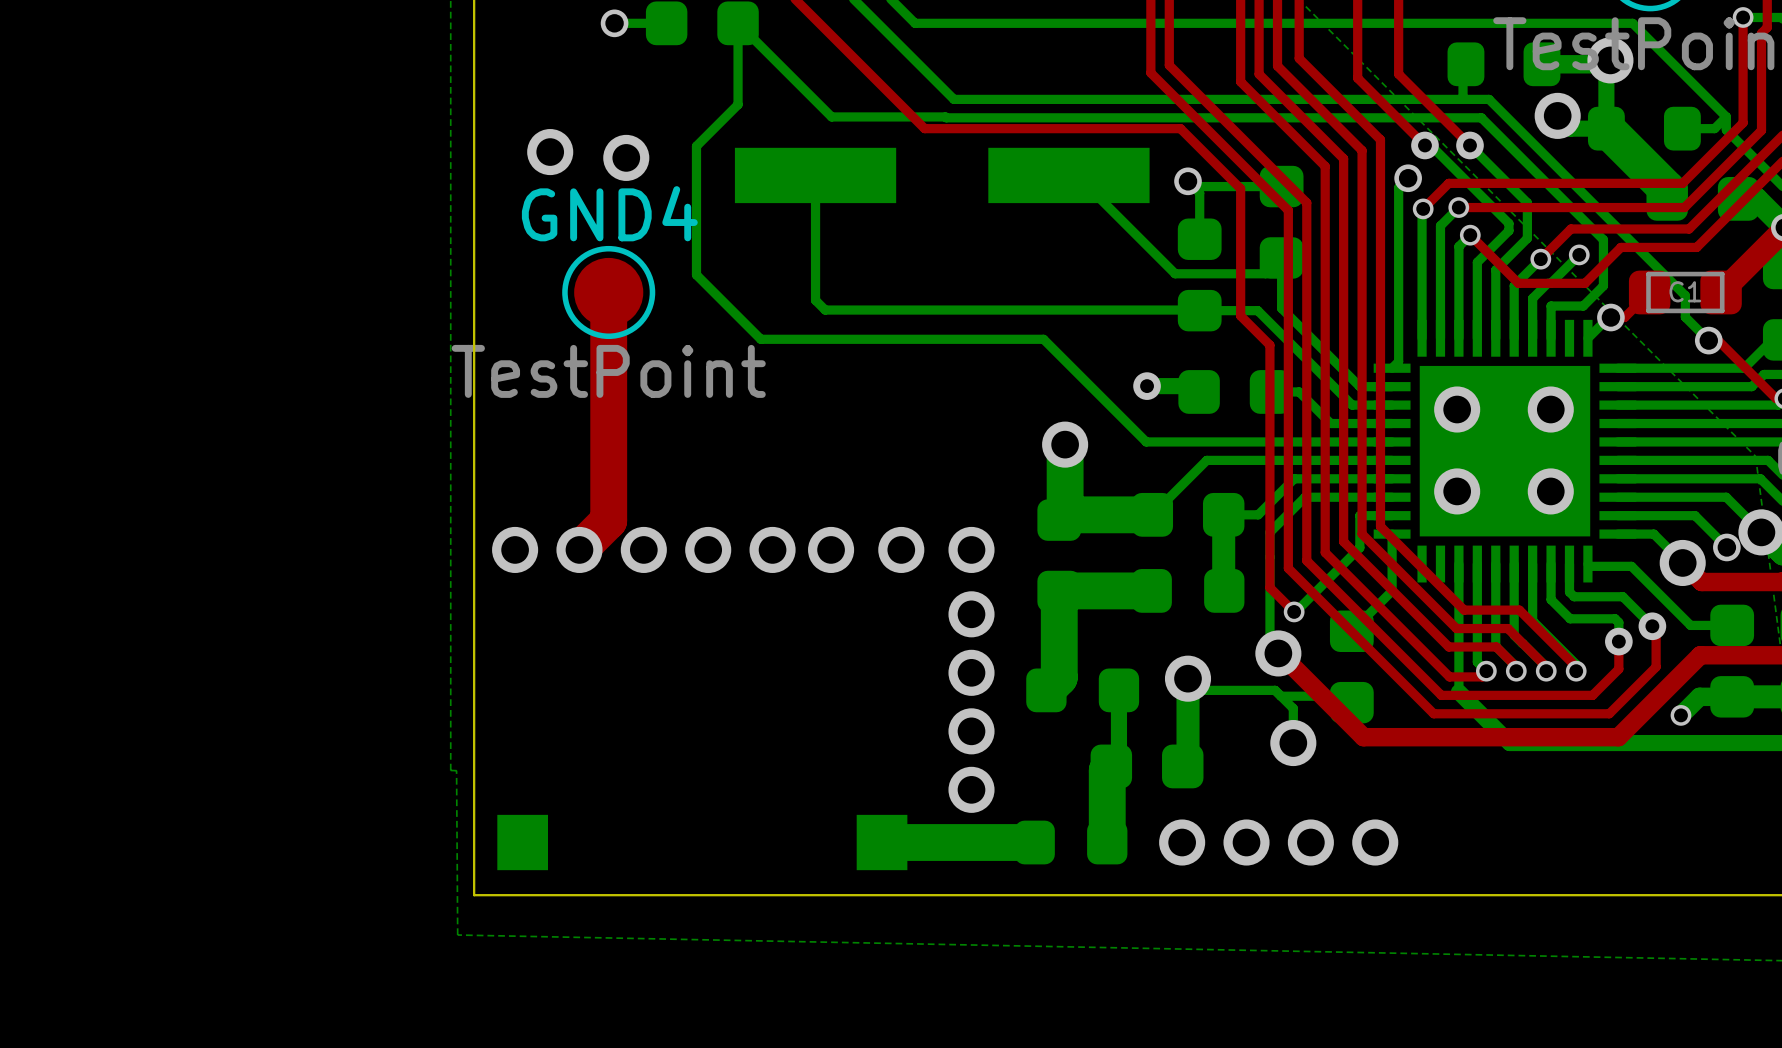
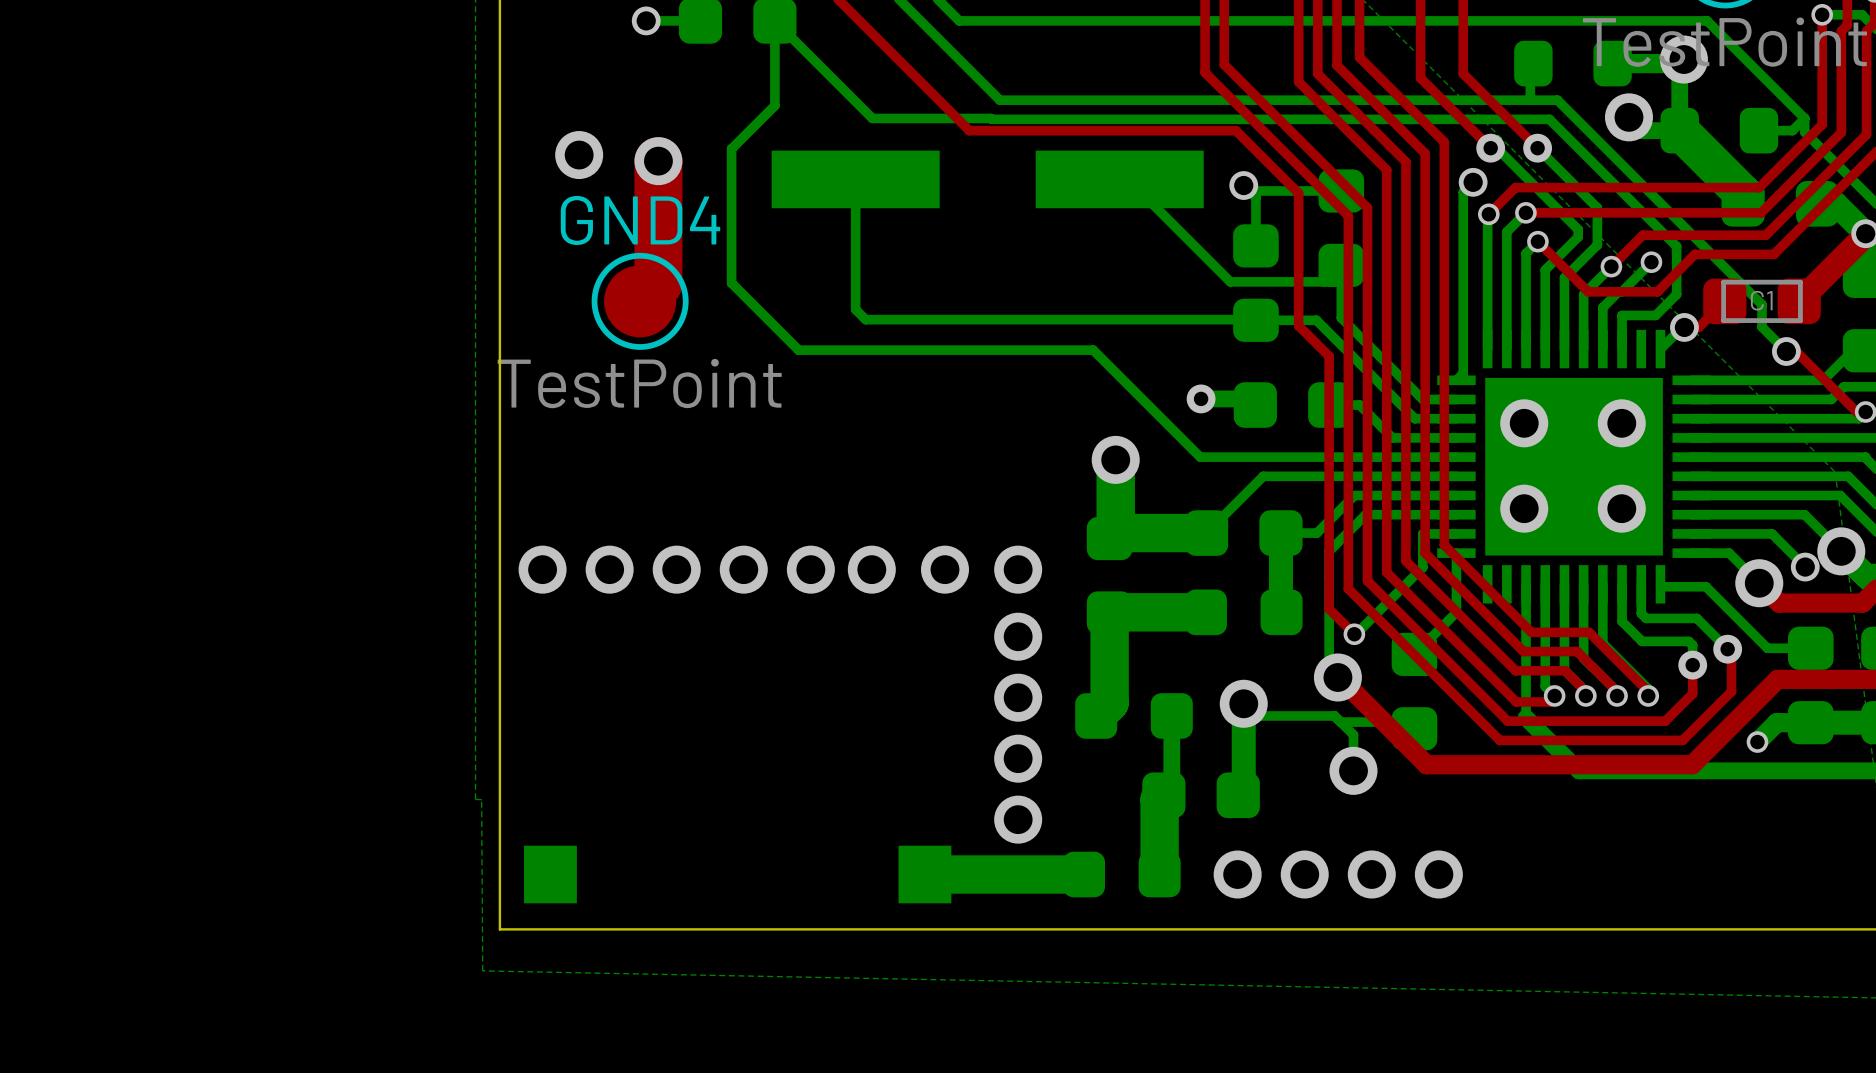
top track: (608, 292) (608, 520) (579, 549) -> (640, 301) (658, 283) (658, 161)

